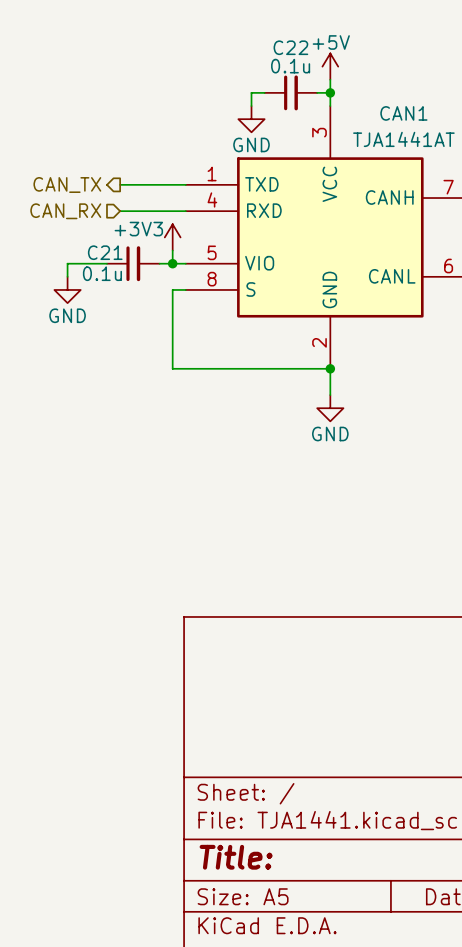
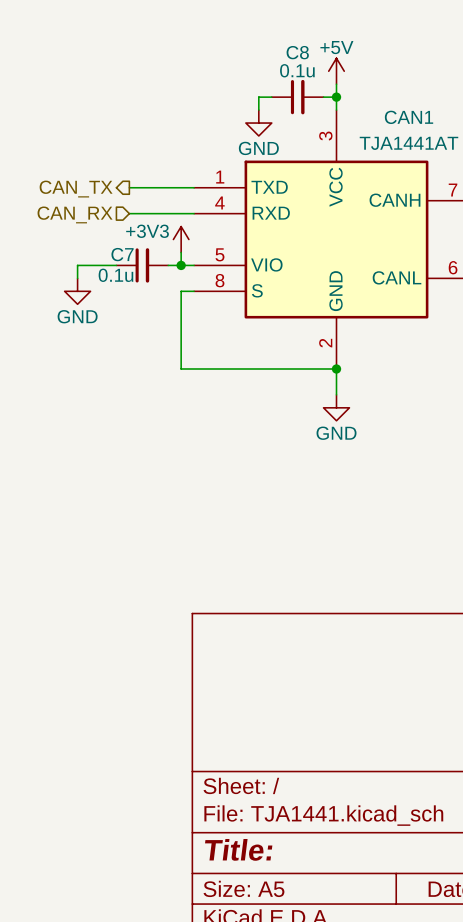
C22 name: C22 (290, 47) -> C8 (297, 52)
C21 name: C21 (105, 252) -> C7 (122, 254)

